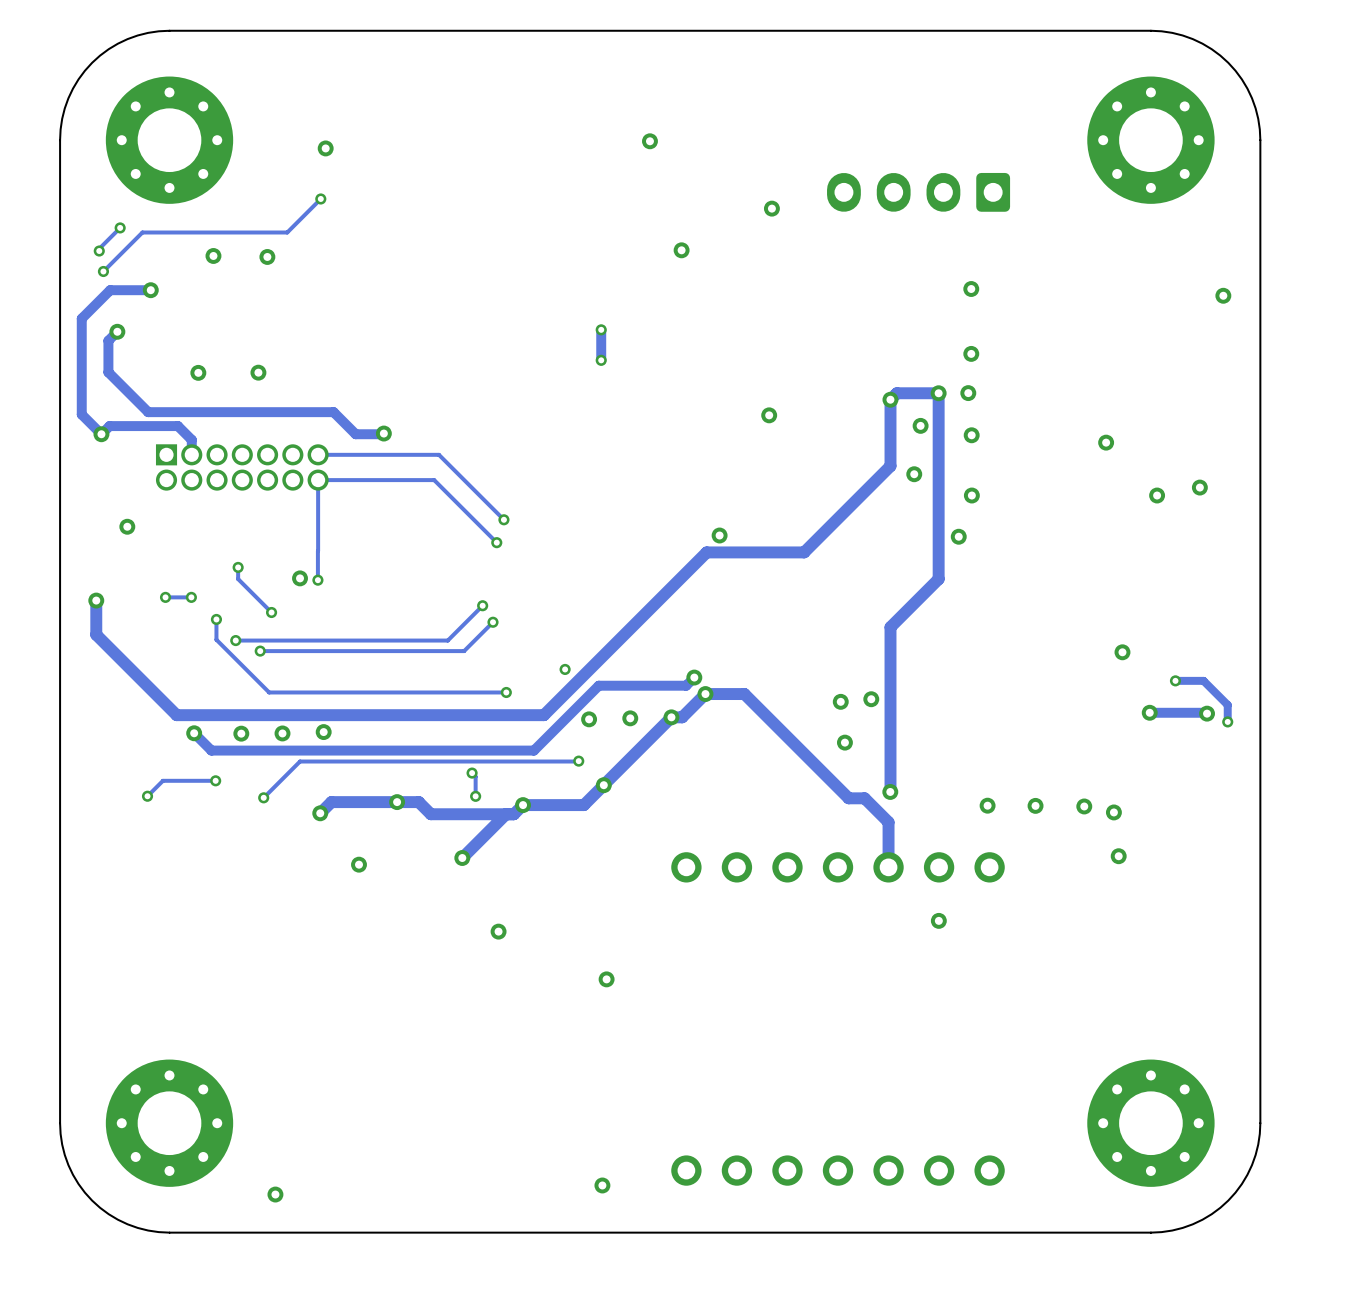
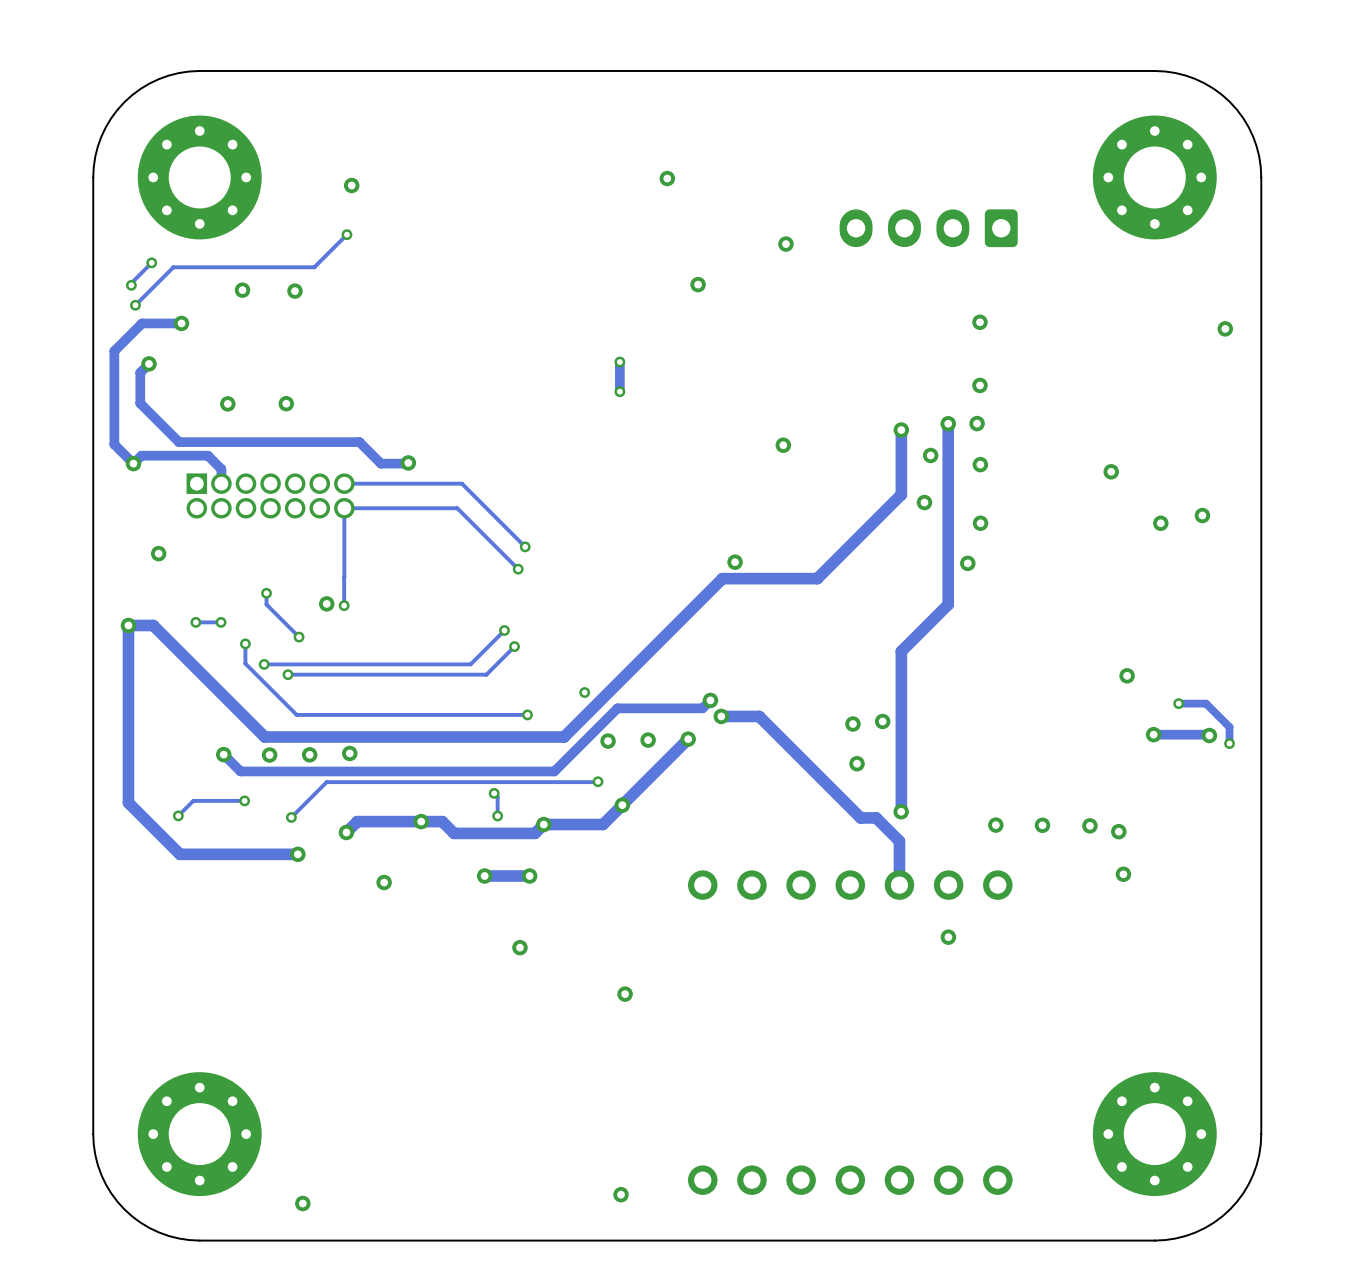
track: (938, 393) (896, 393) (890, 399) -> none
track: (96, 634) (176, 715) (236, 715) -> (128, 625) (153, 625) (264, 737)
track: none -> (128, 658) (128, 802) (179, 854) (297, 854)
track: (705, 694) (682, 717) (671, 717) -> none
track: (506, 814) (462, 858) -> (529, 876) (484, 876)
via: none -> (297, 854)
via: none -> (529, 876)

